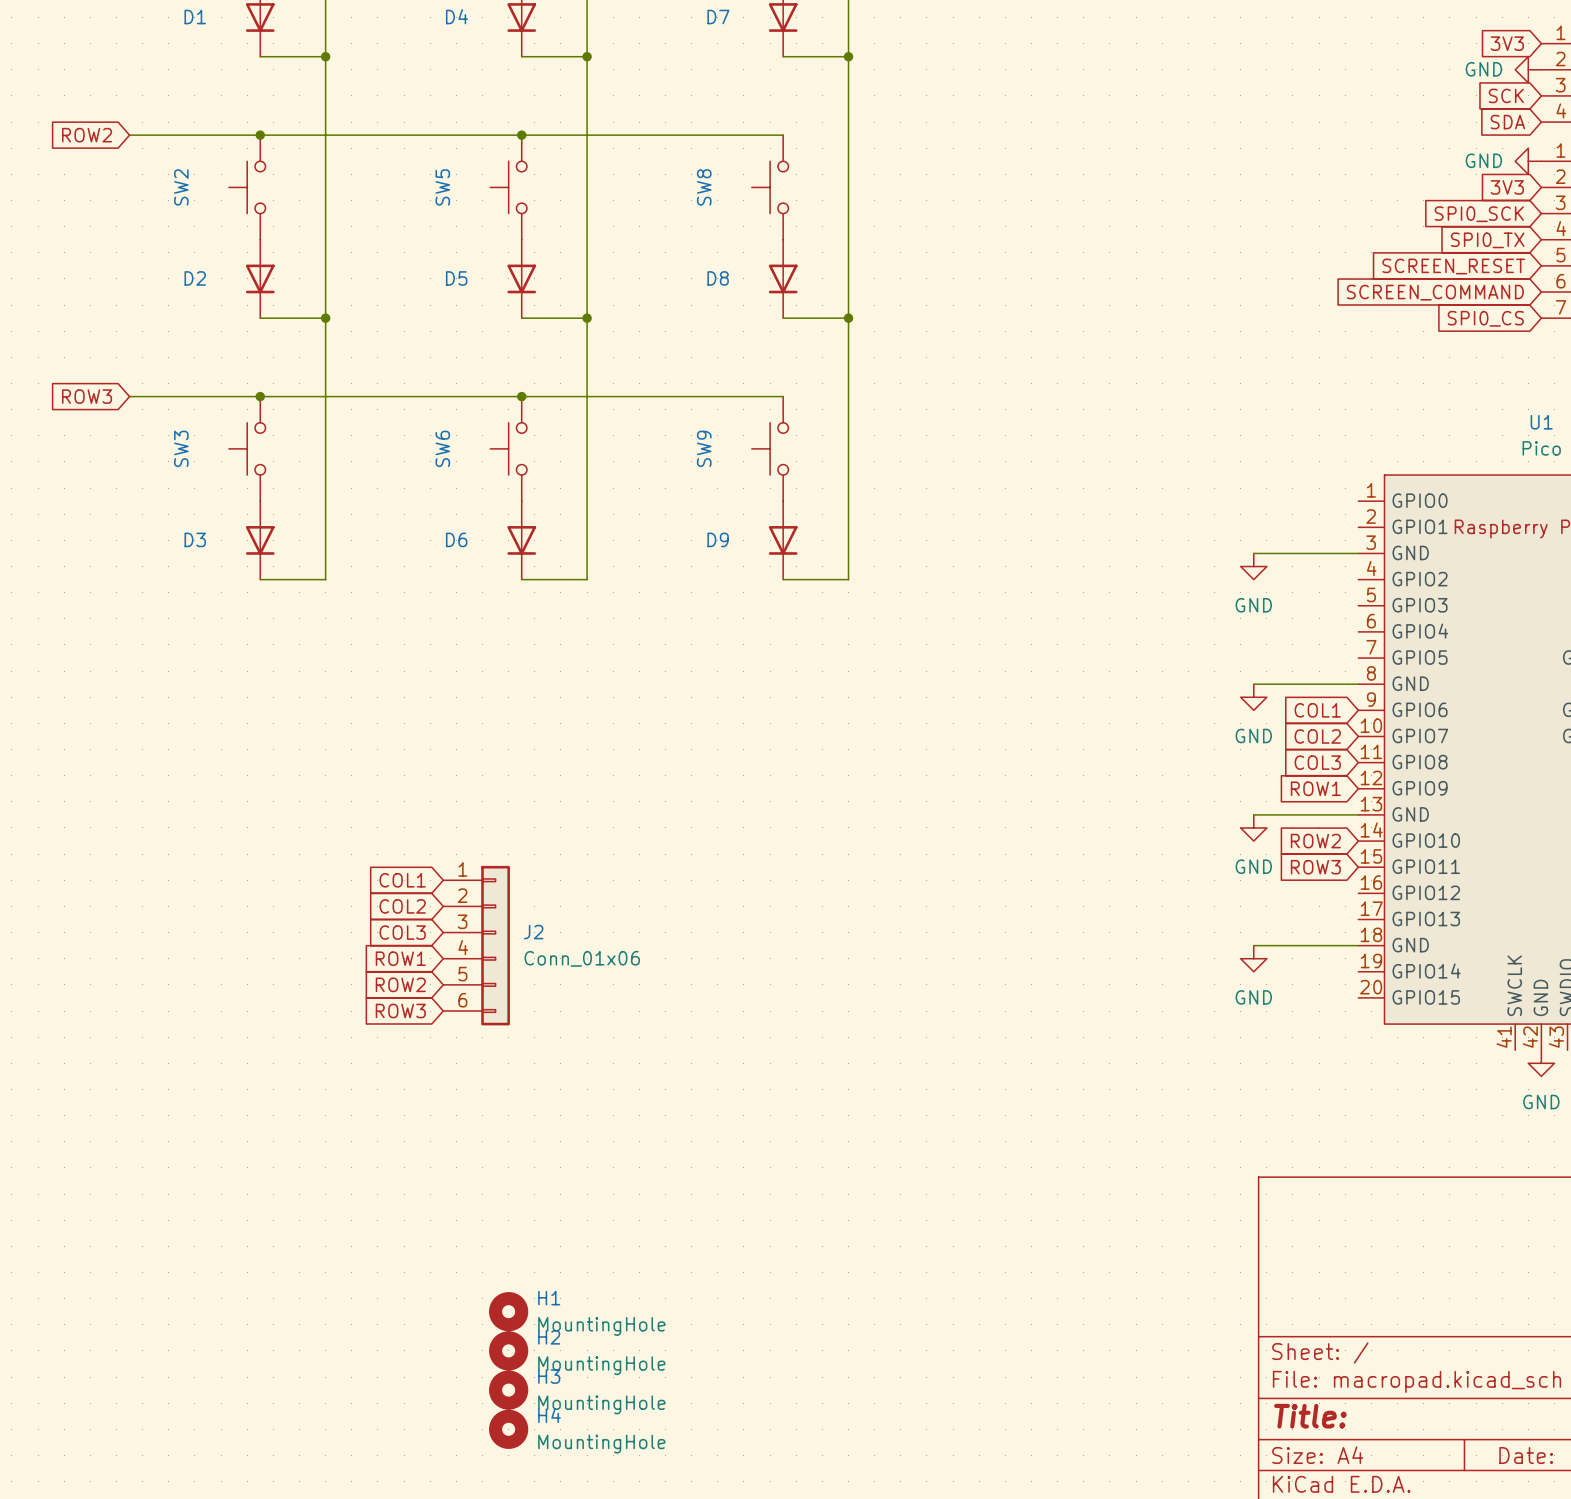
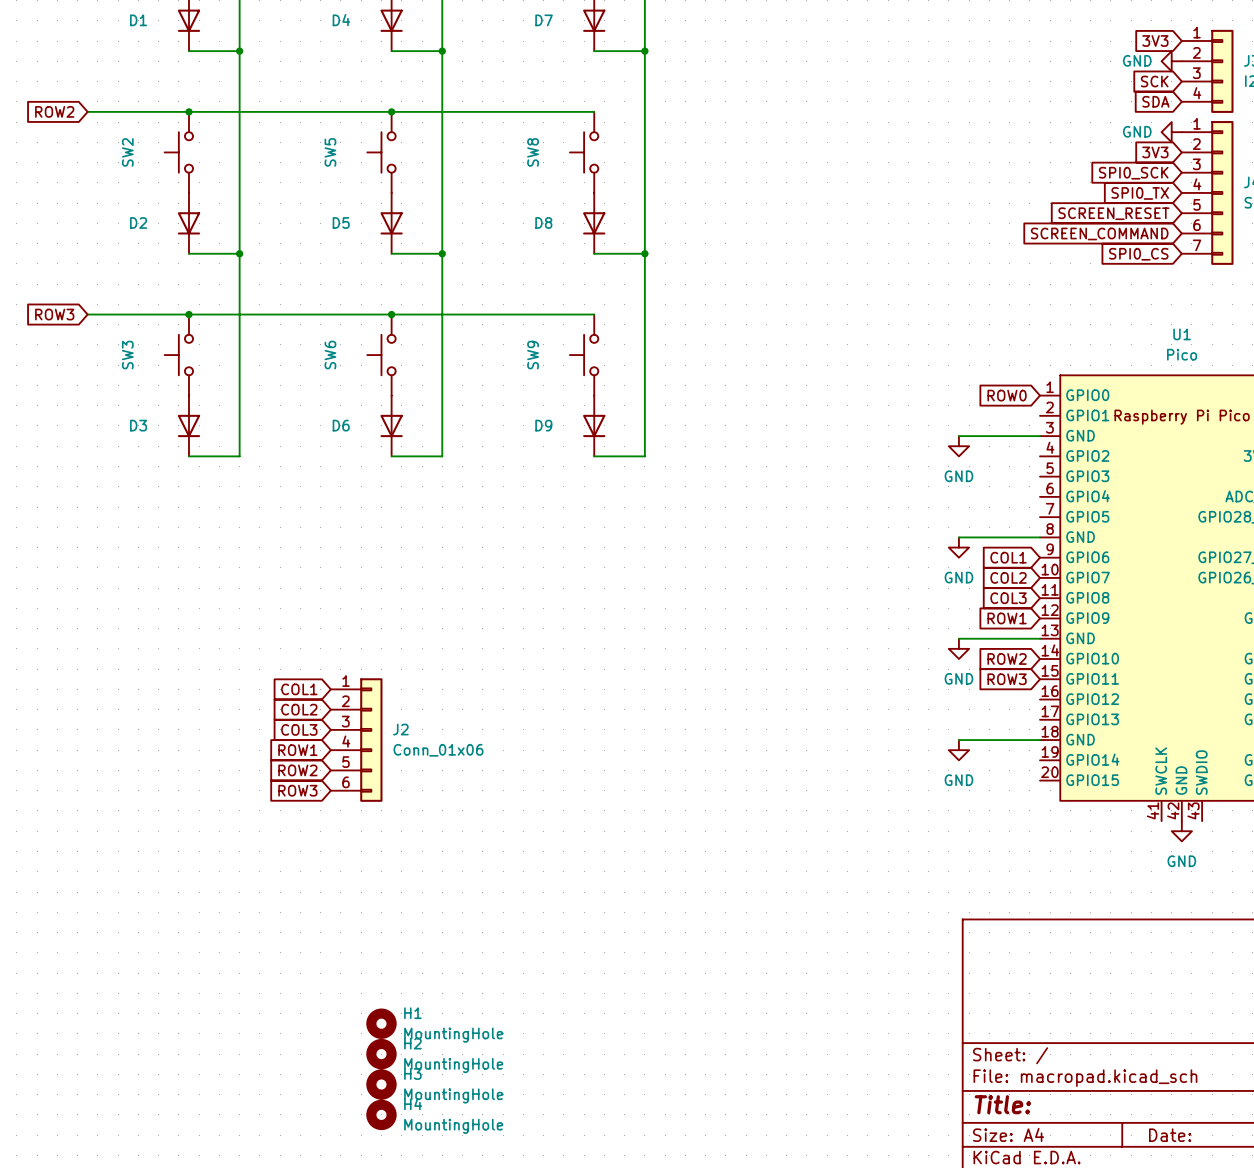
global label: none -> ROW0 (1007, 395)

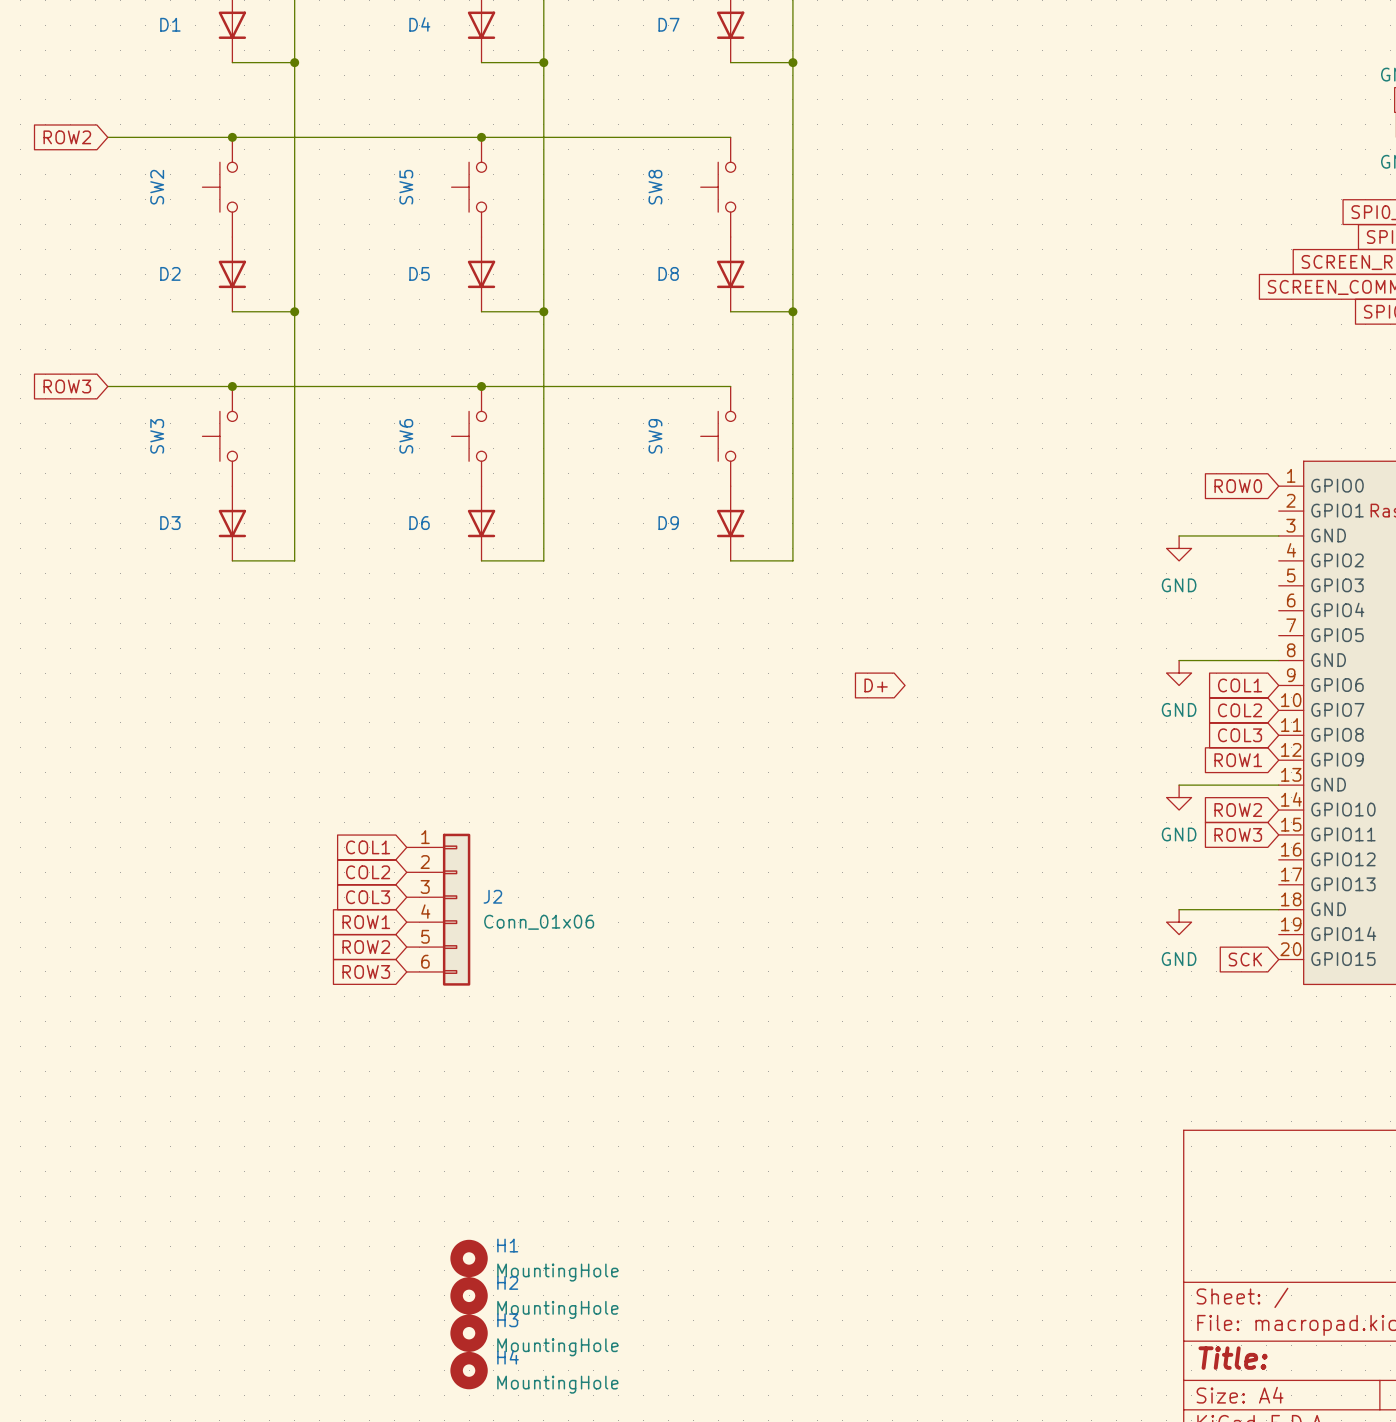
global label: none -> D+ (876, 685)
global label: none -> SCK (1245, 959)

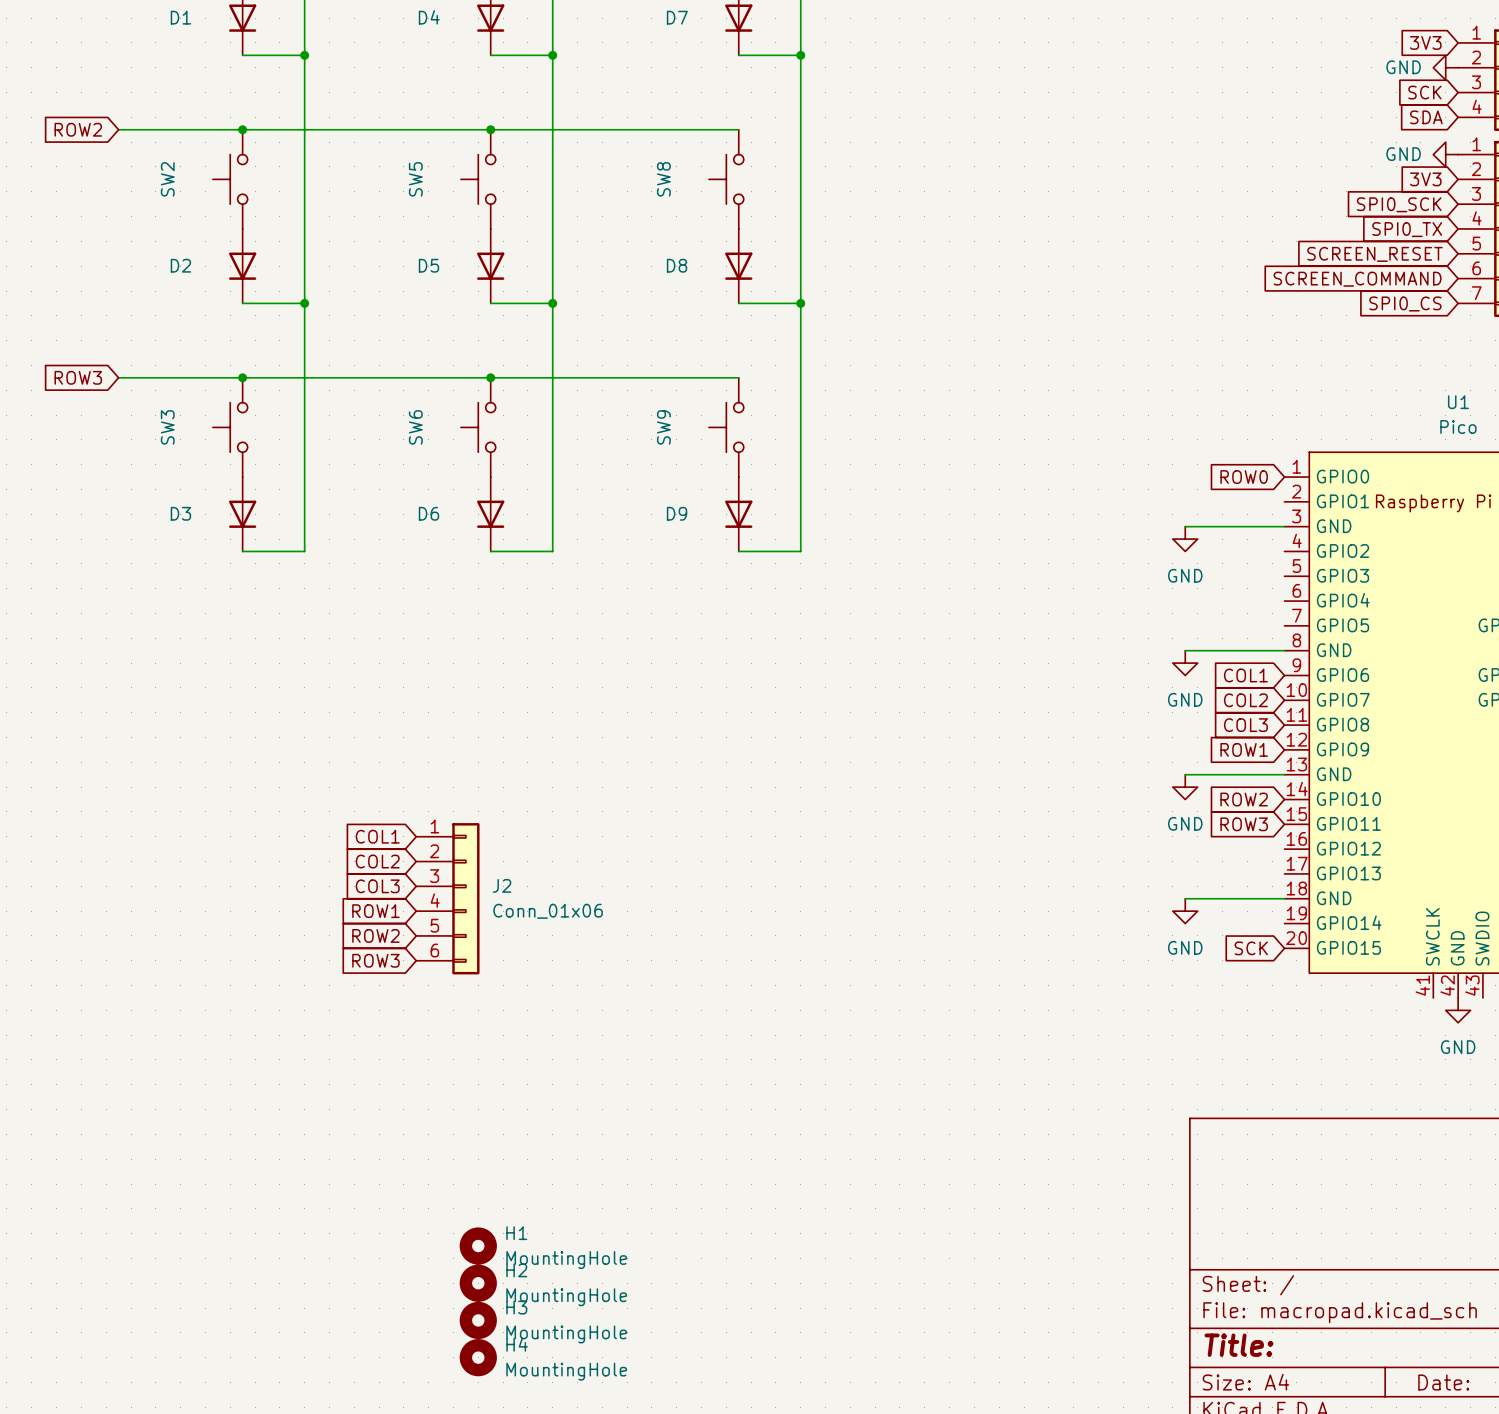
global label: D+ (876, 685) -> none

